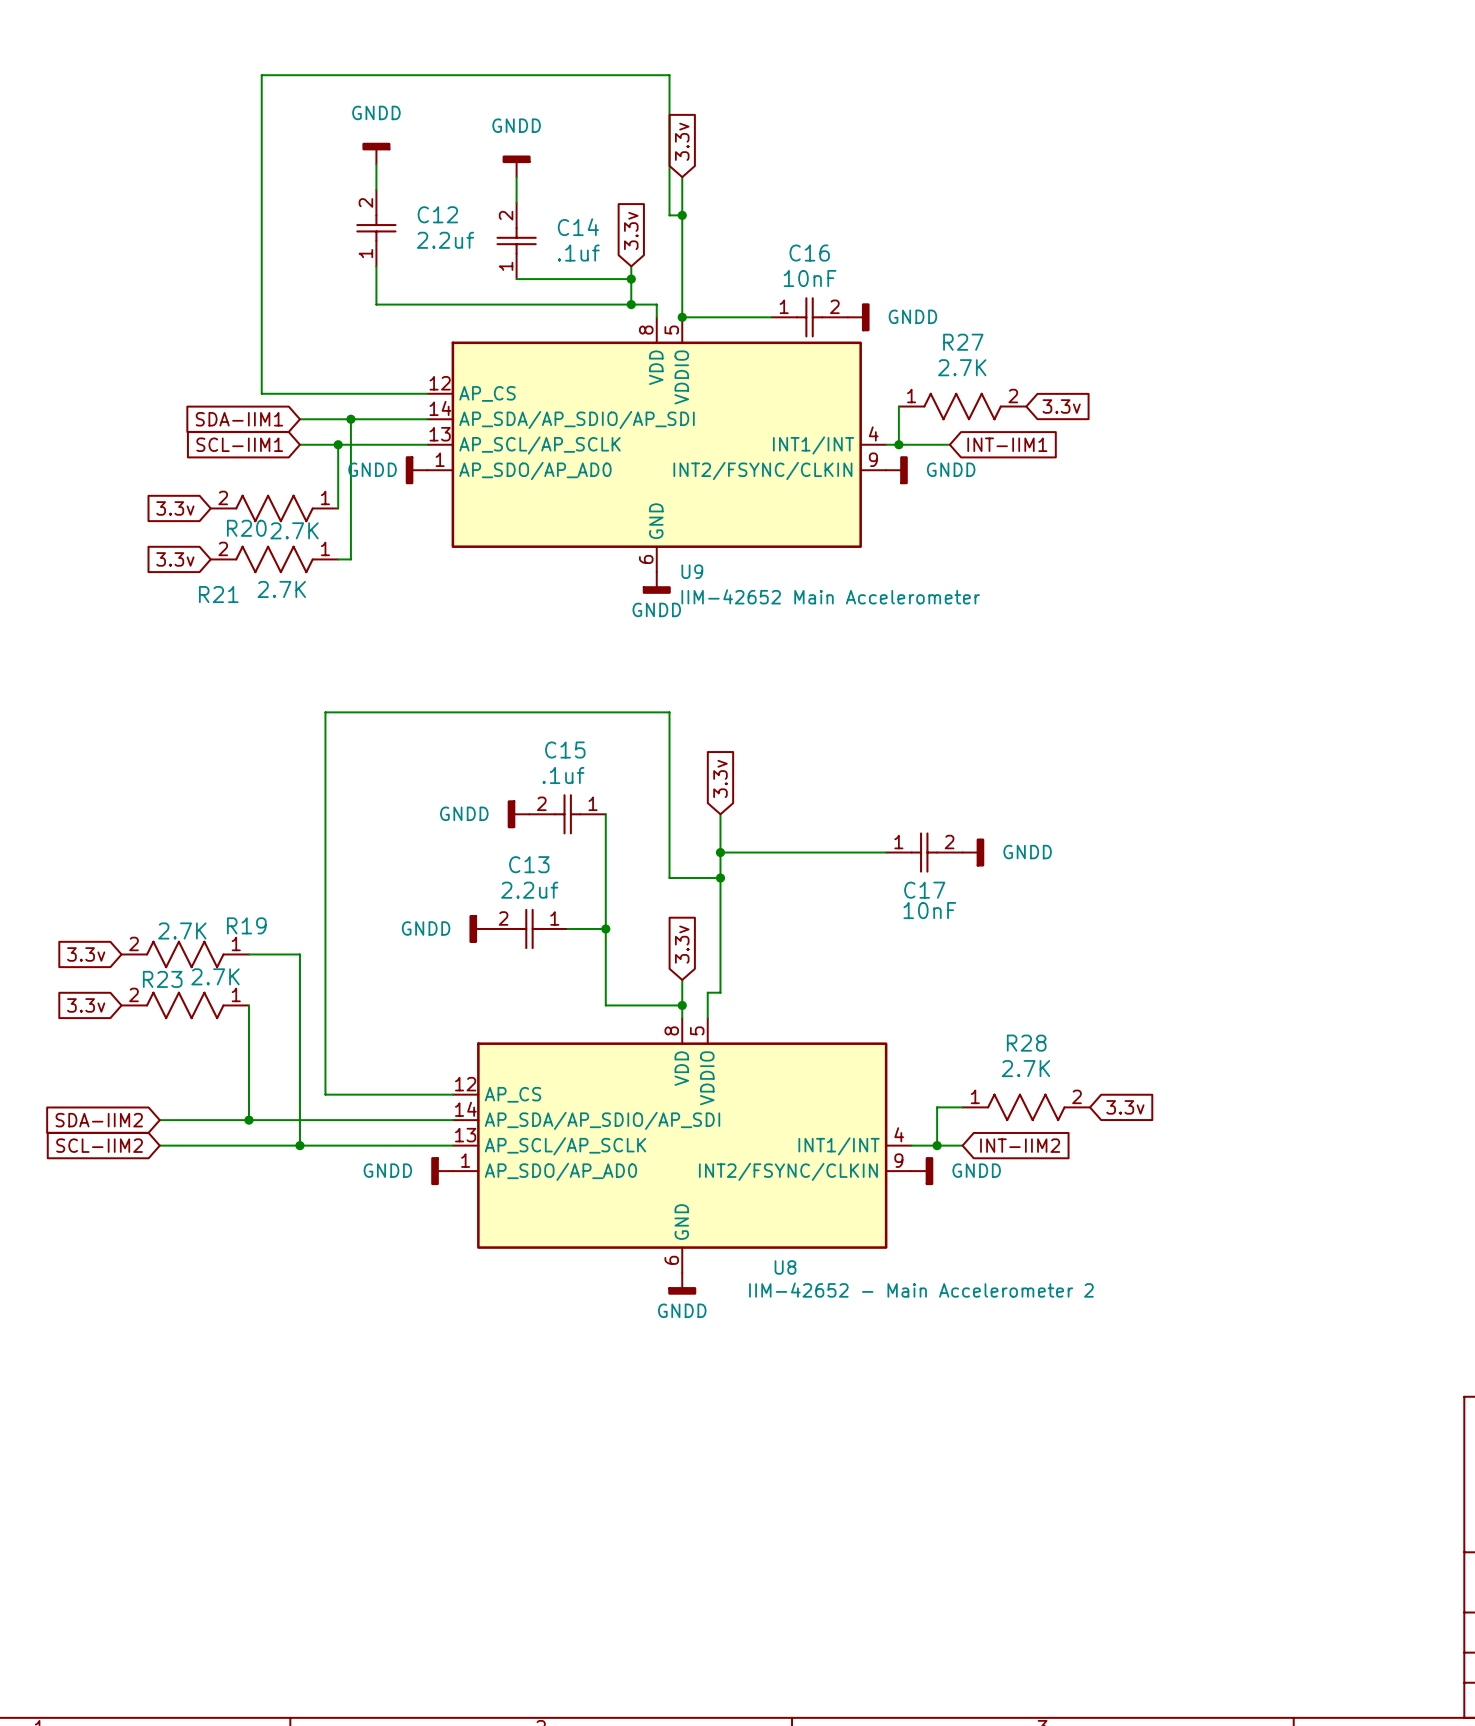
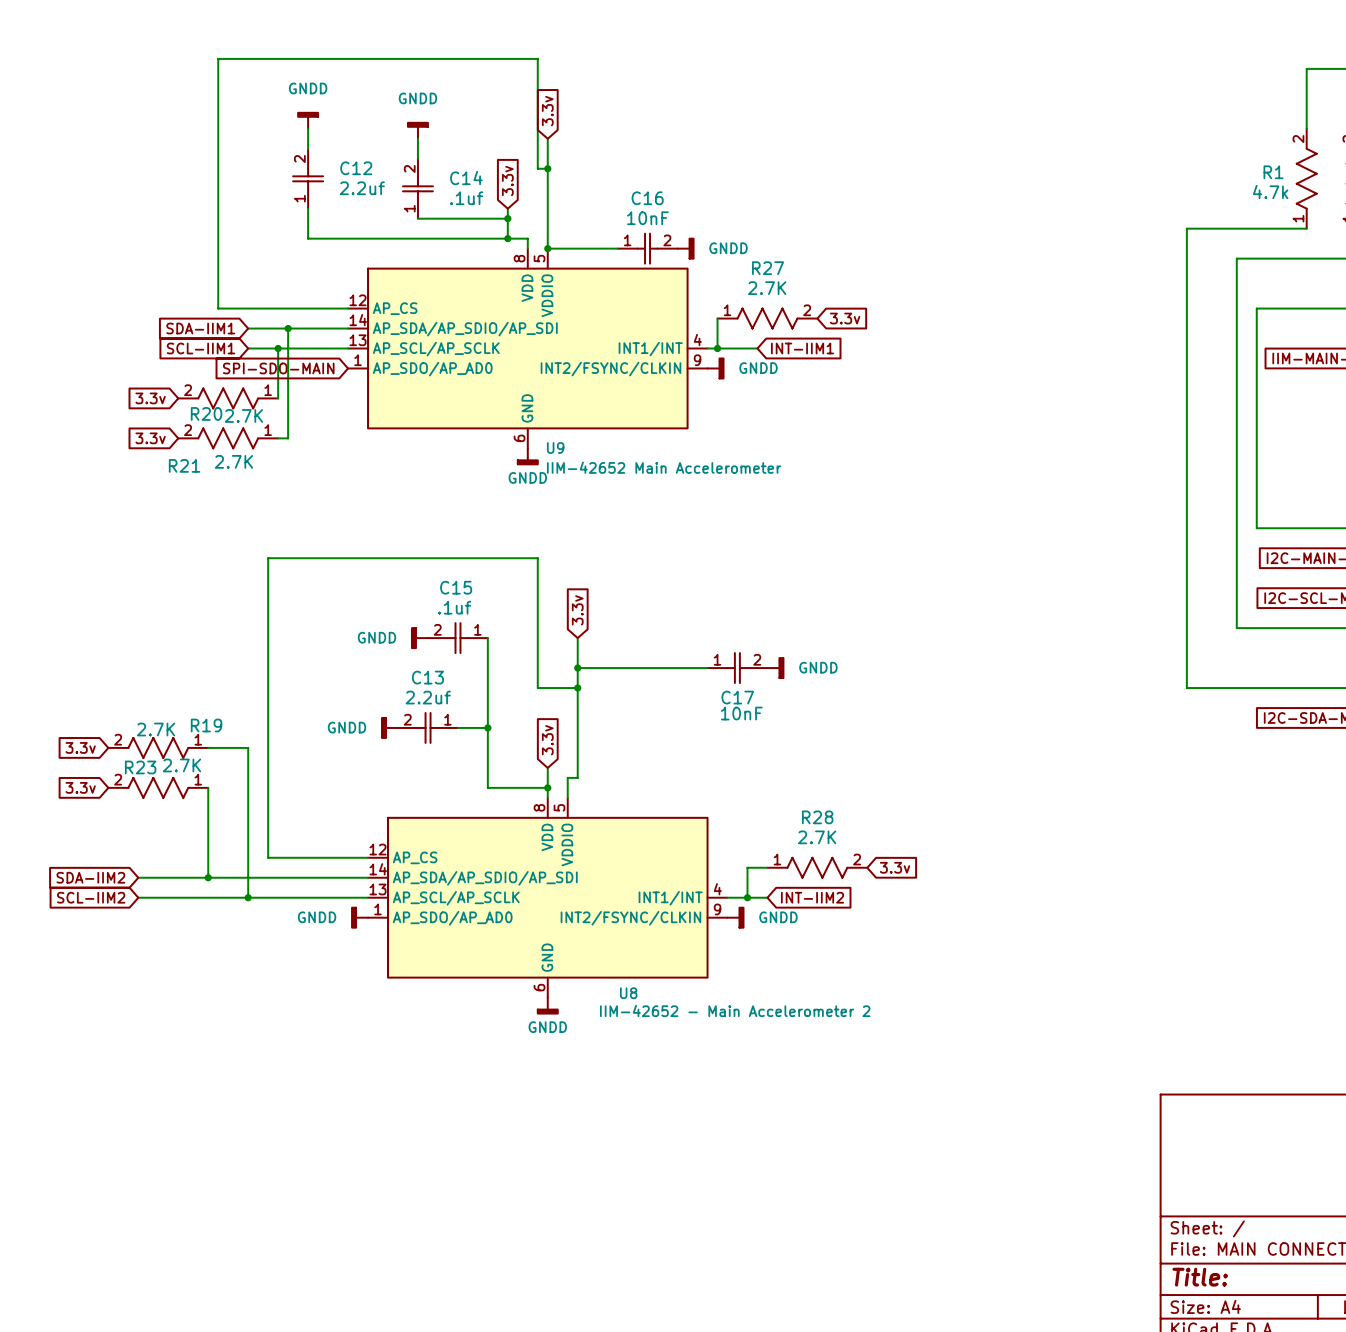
global label: none -> SPI-SDO-MAIN (278, 368)
power symbol: GNDD (416, 470) -> none

